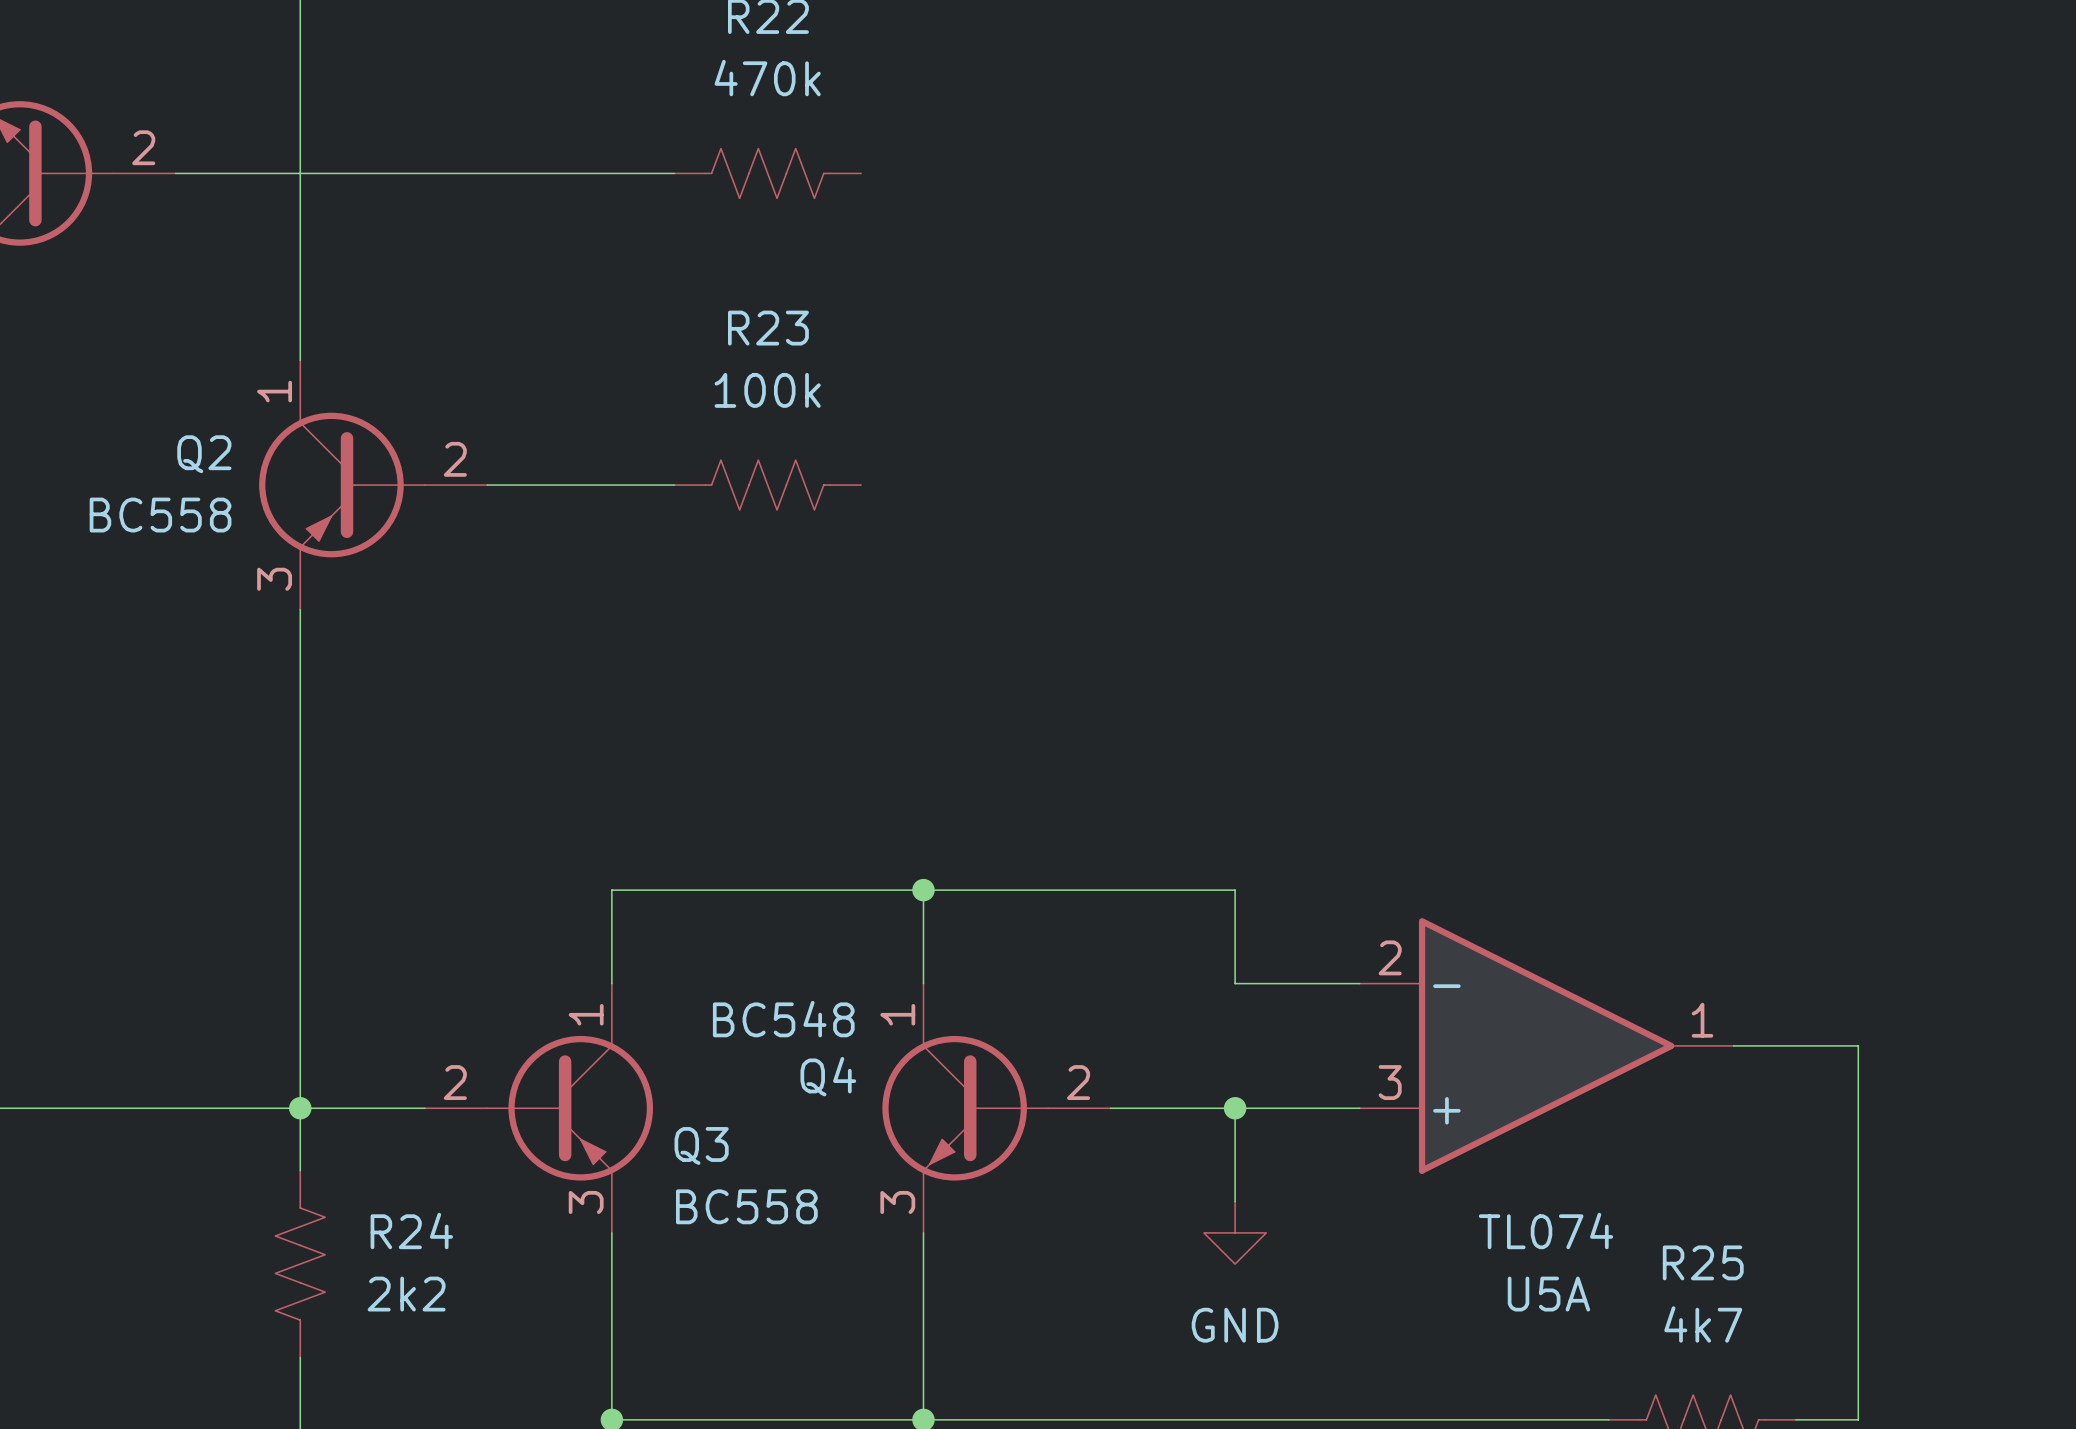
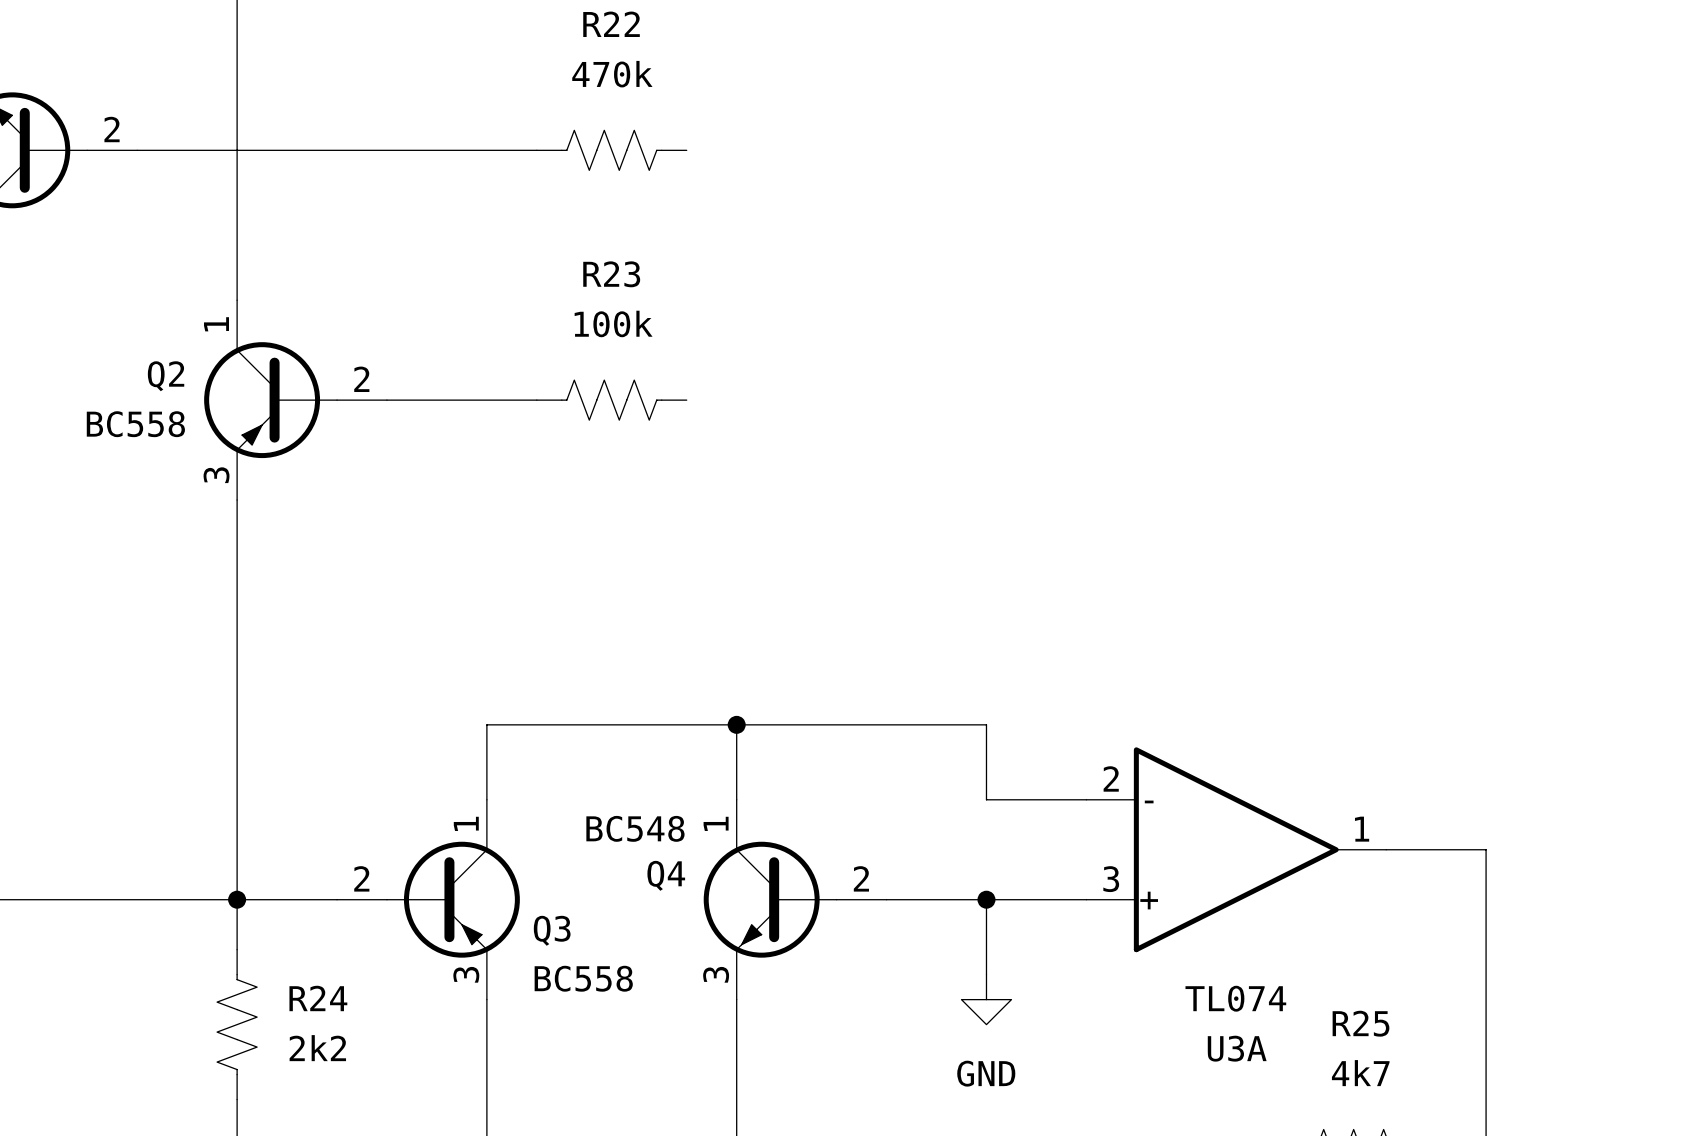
U5A name: U5A (1548, 1294) -> U3A (1237, 1048)

